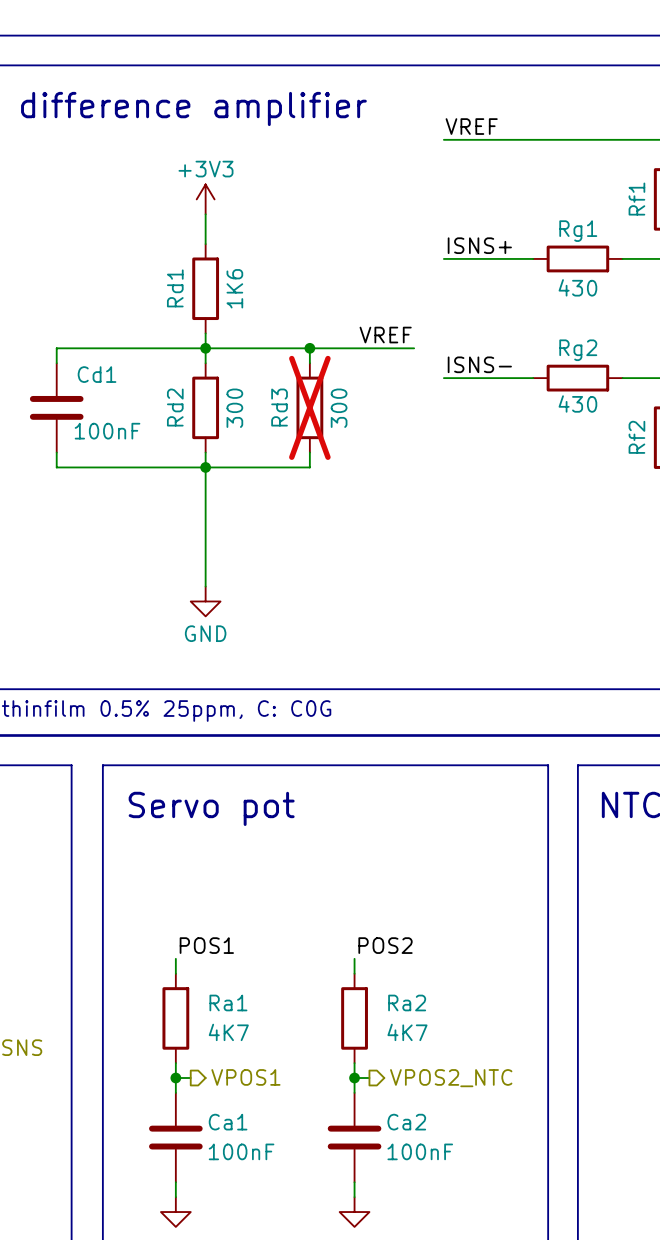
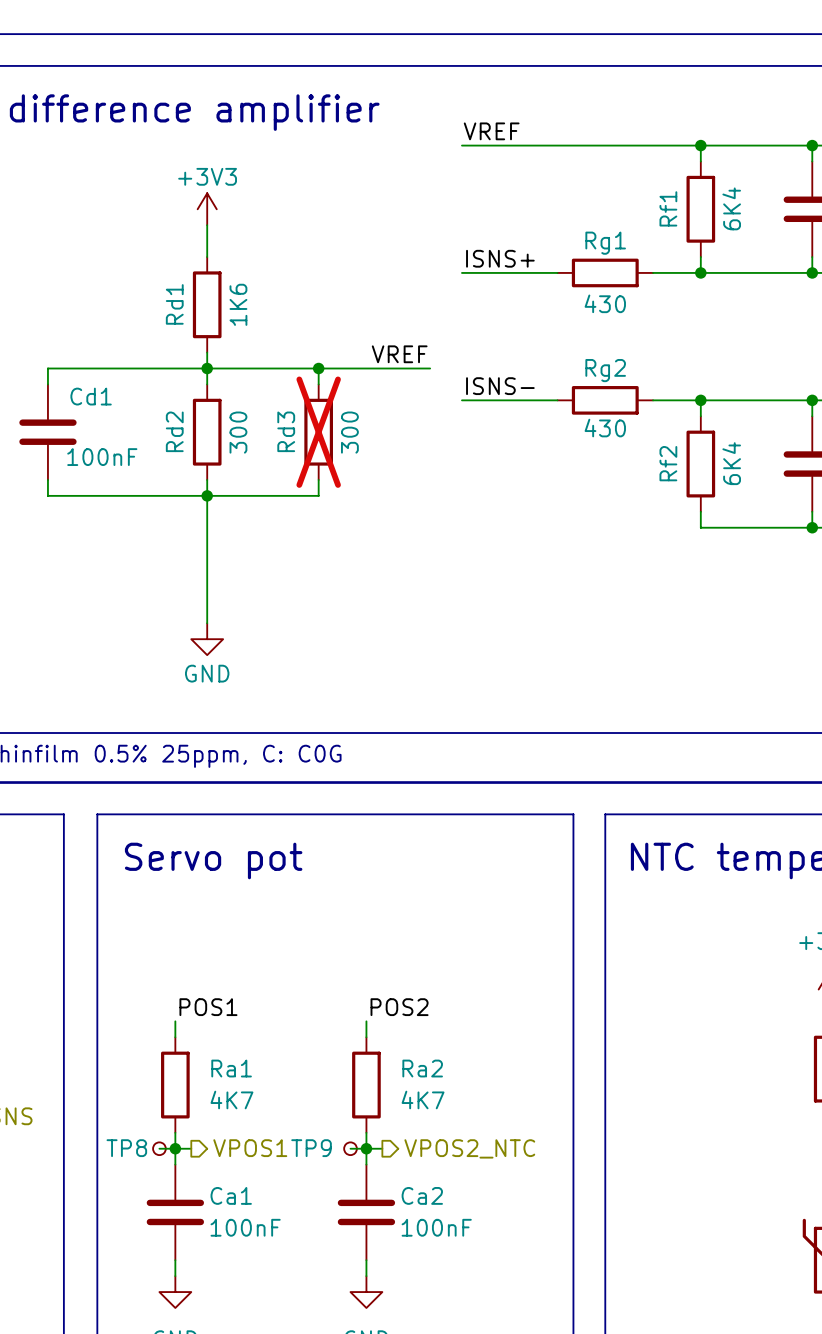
wire: none -> (159, 1148) (175, 1148)
TP8: none -> (159, 1148)
wire: none -> (350, 1148) (366, 1148)
TP9: none -> (350, 1148)

